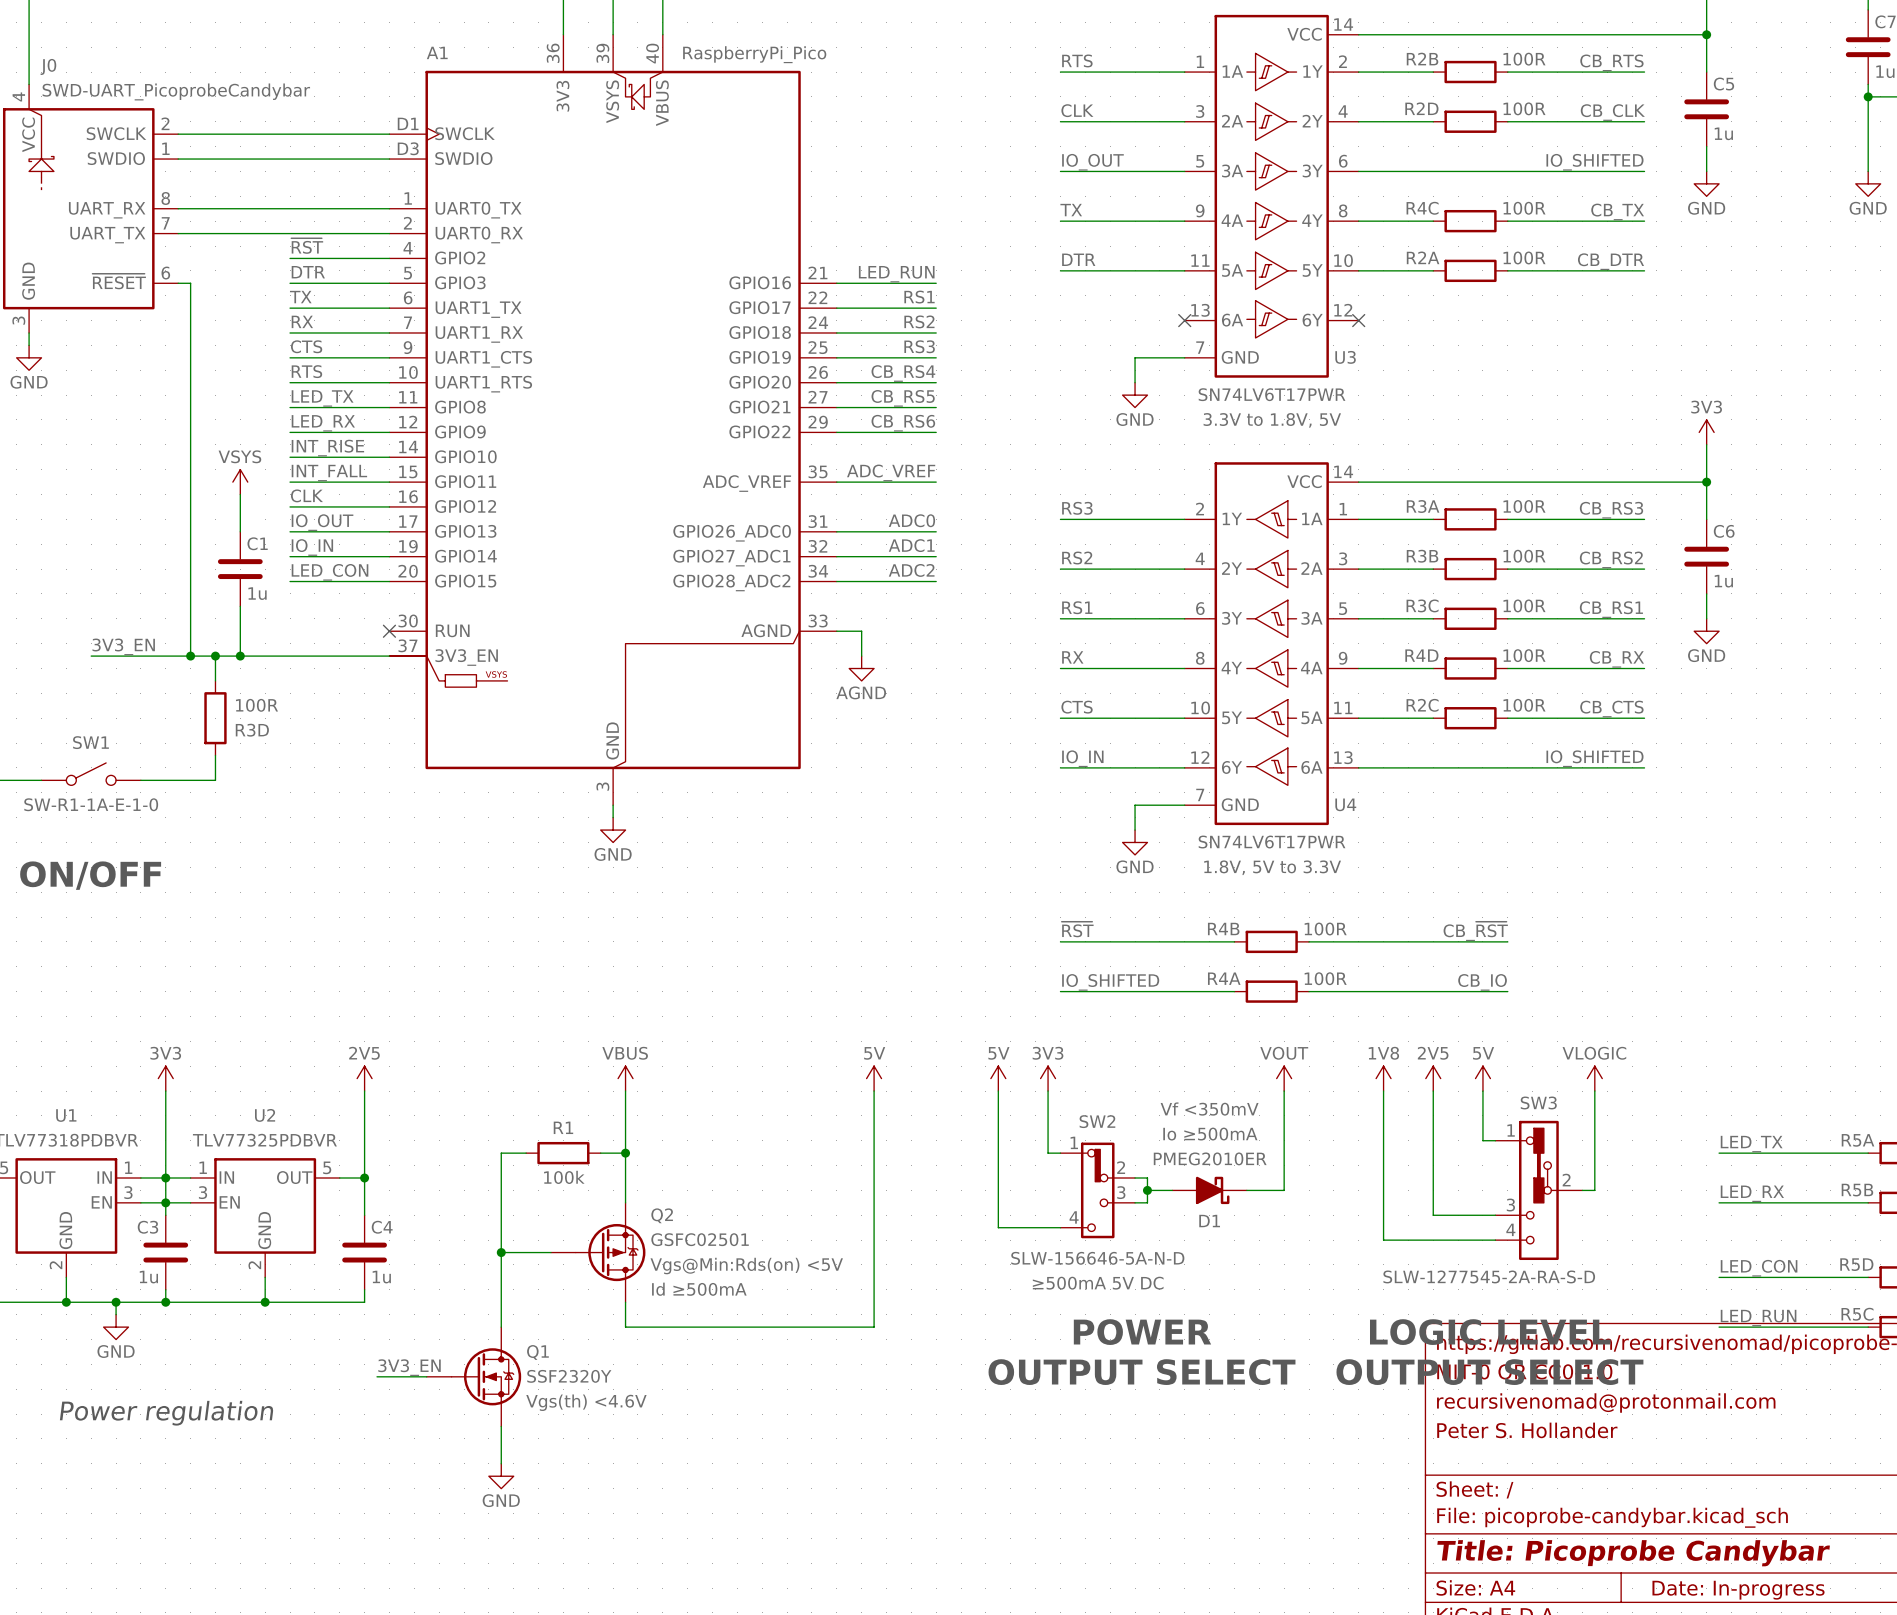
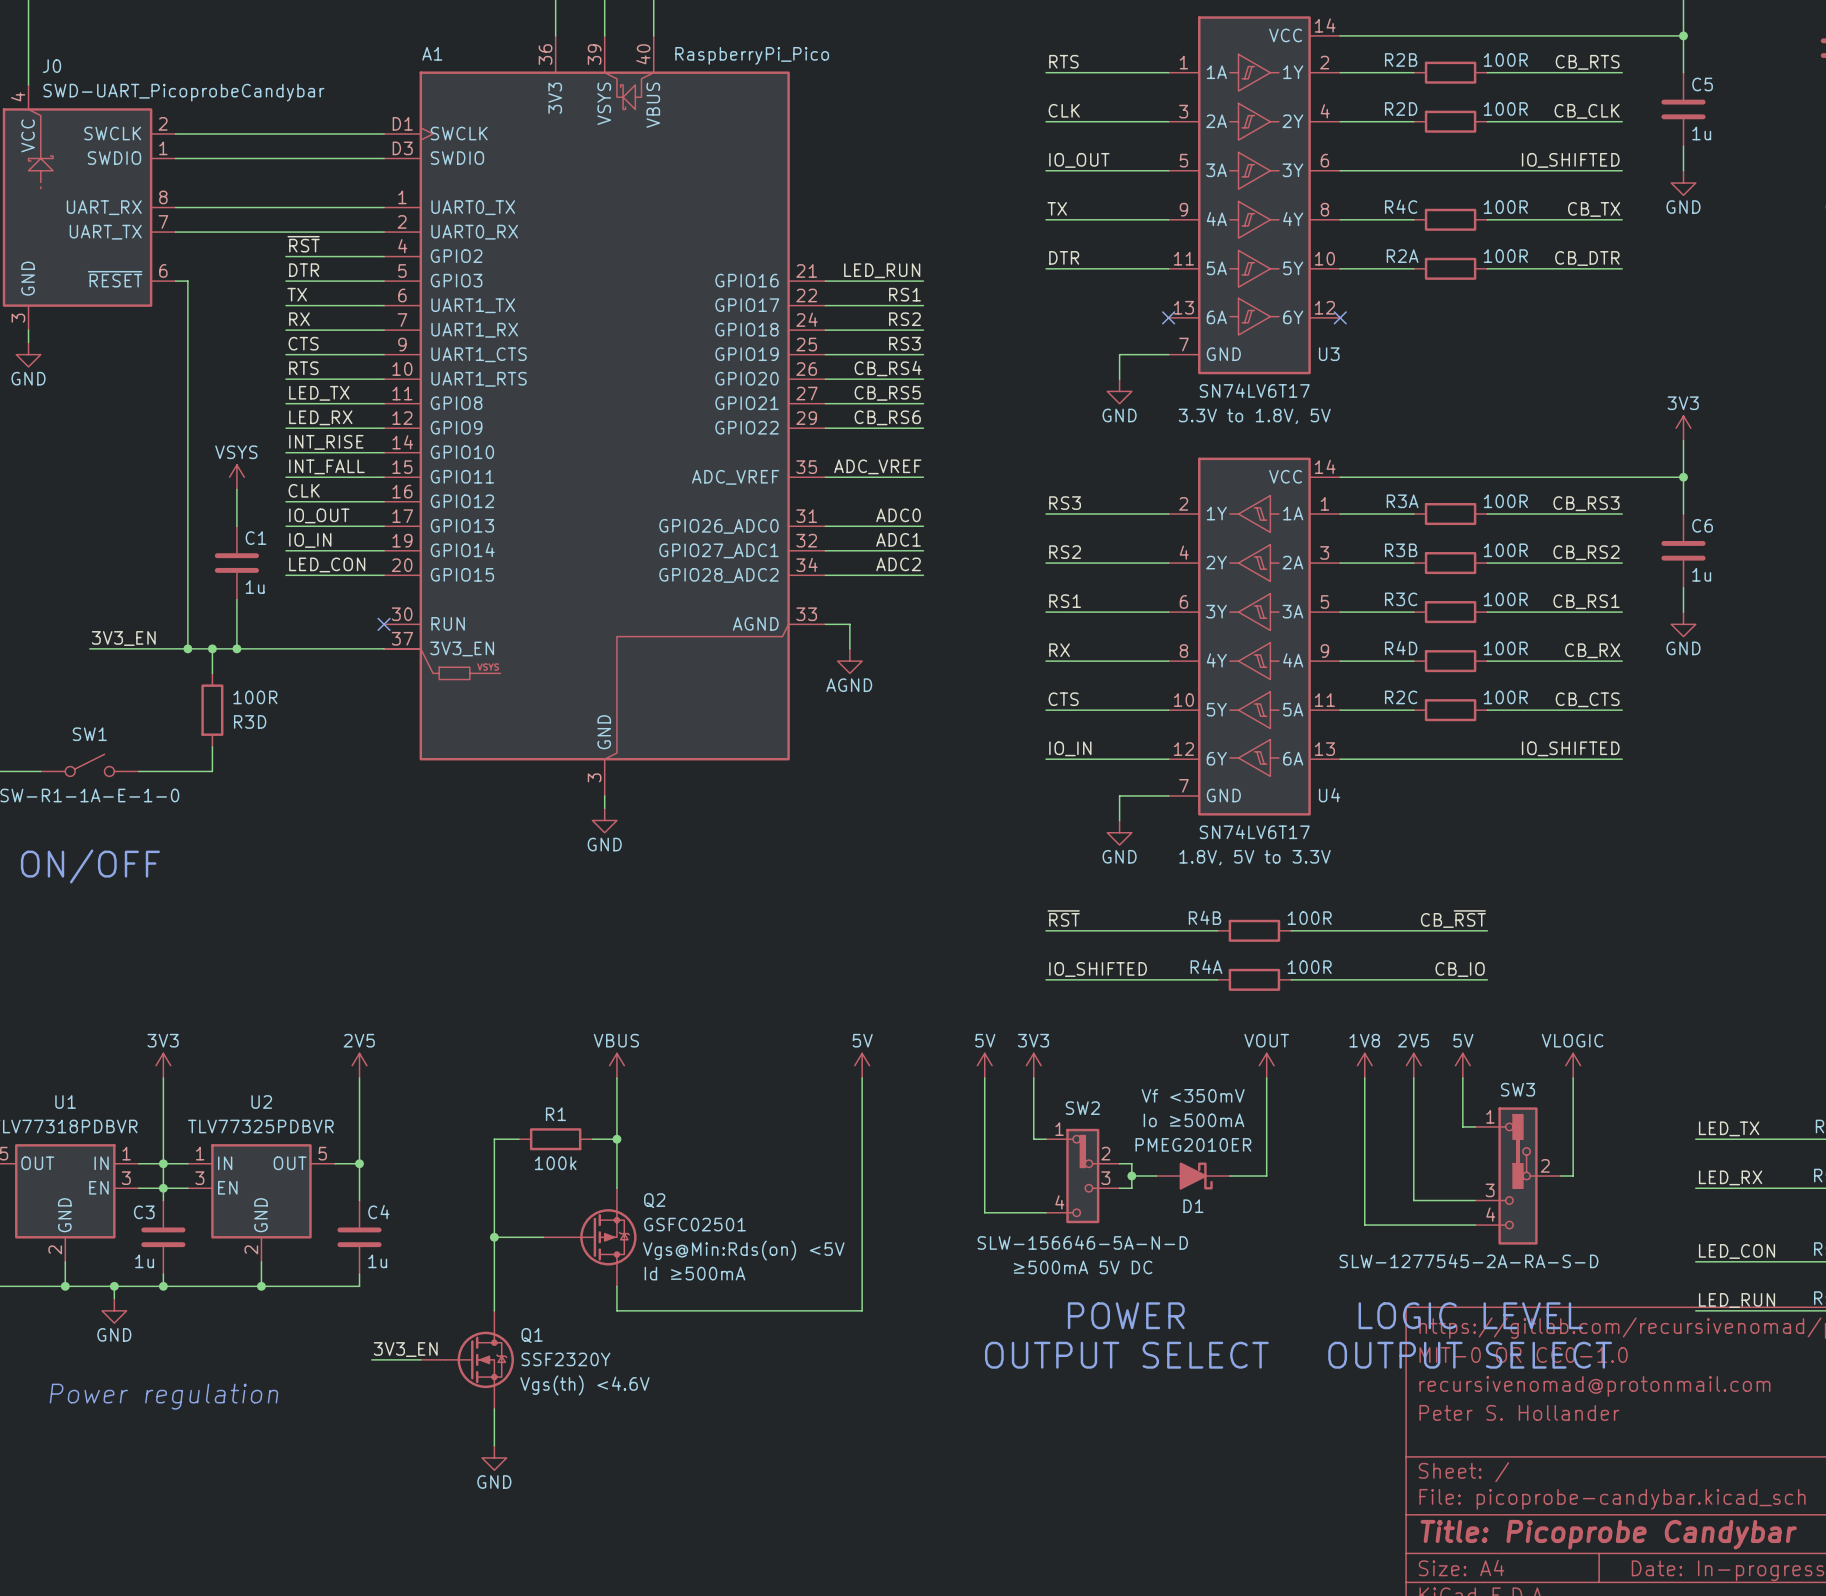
U3 value: SN74LV6T17PWR (1272, 394) -> SN74LV6T17 (1254, 390)
U4 value: SN74LV6T17PWR (1272, 842) -> SN74LV6T17 (1254, 832)

